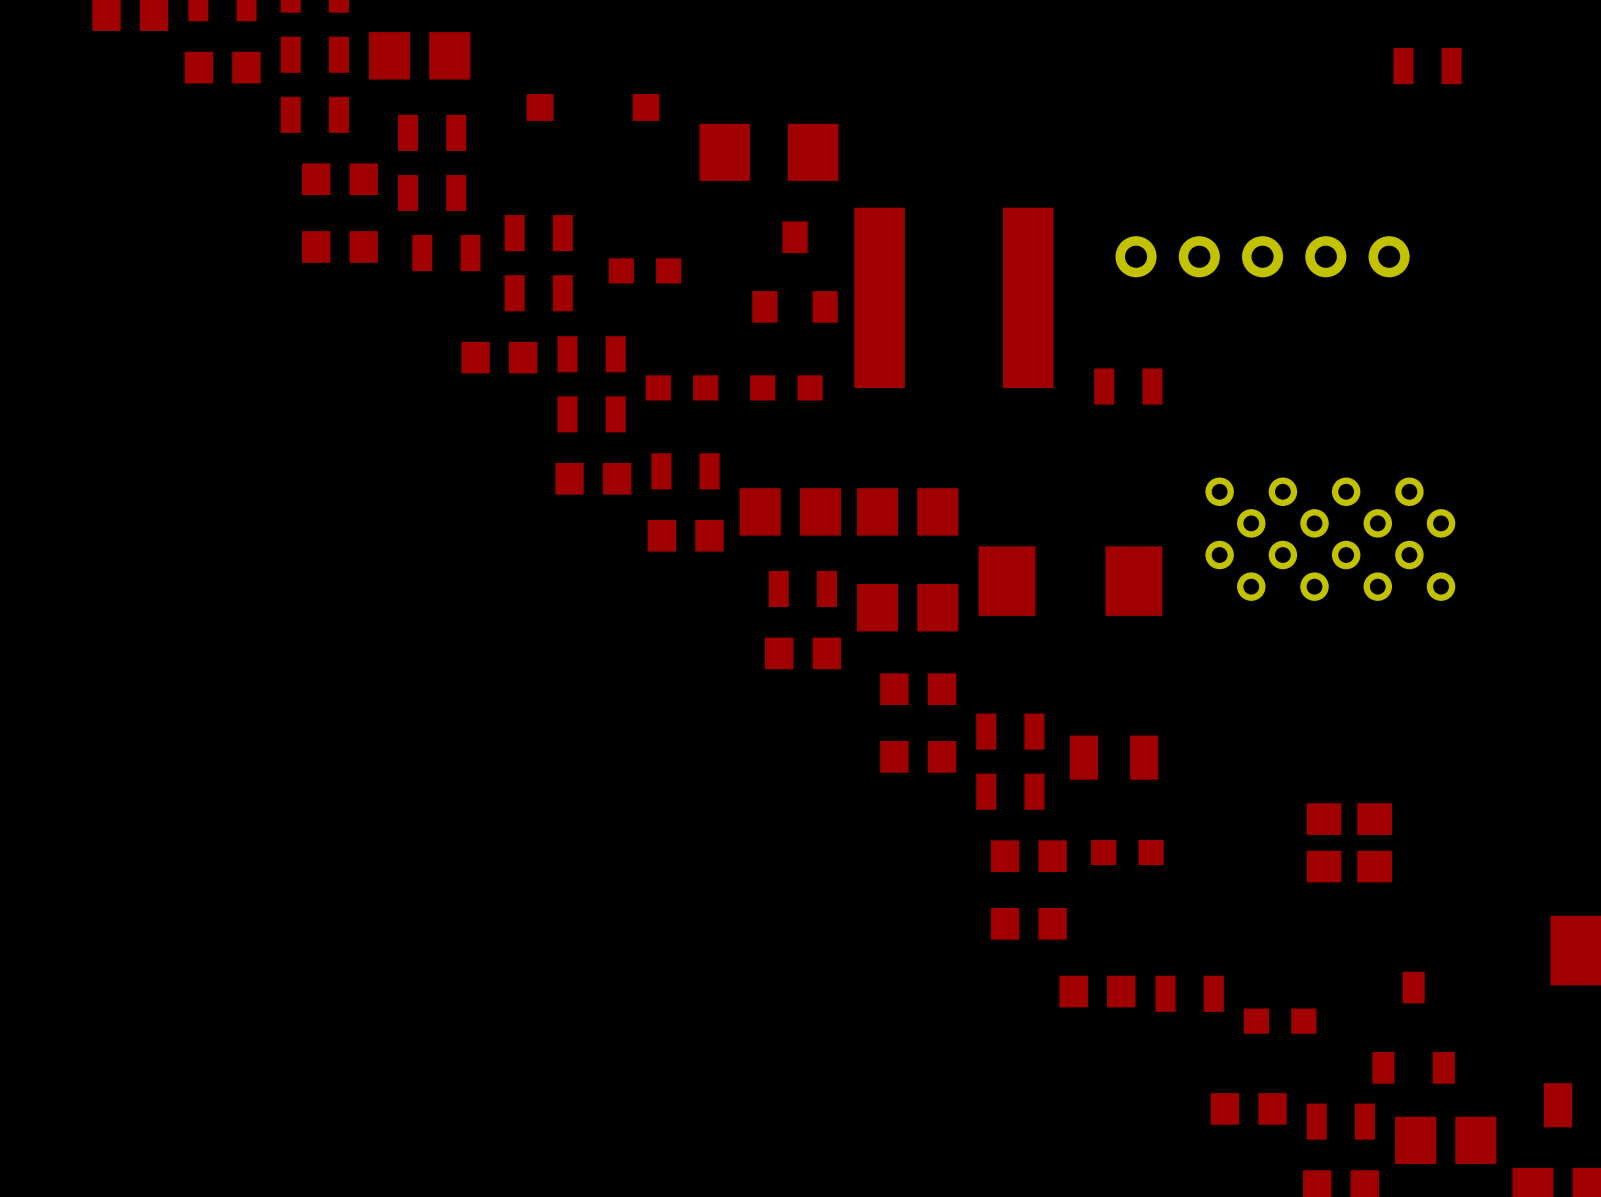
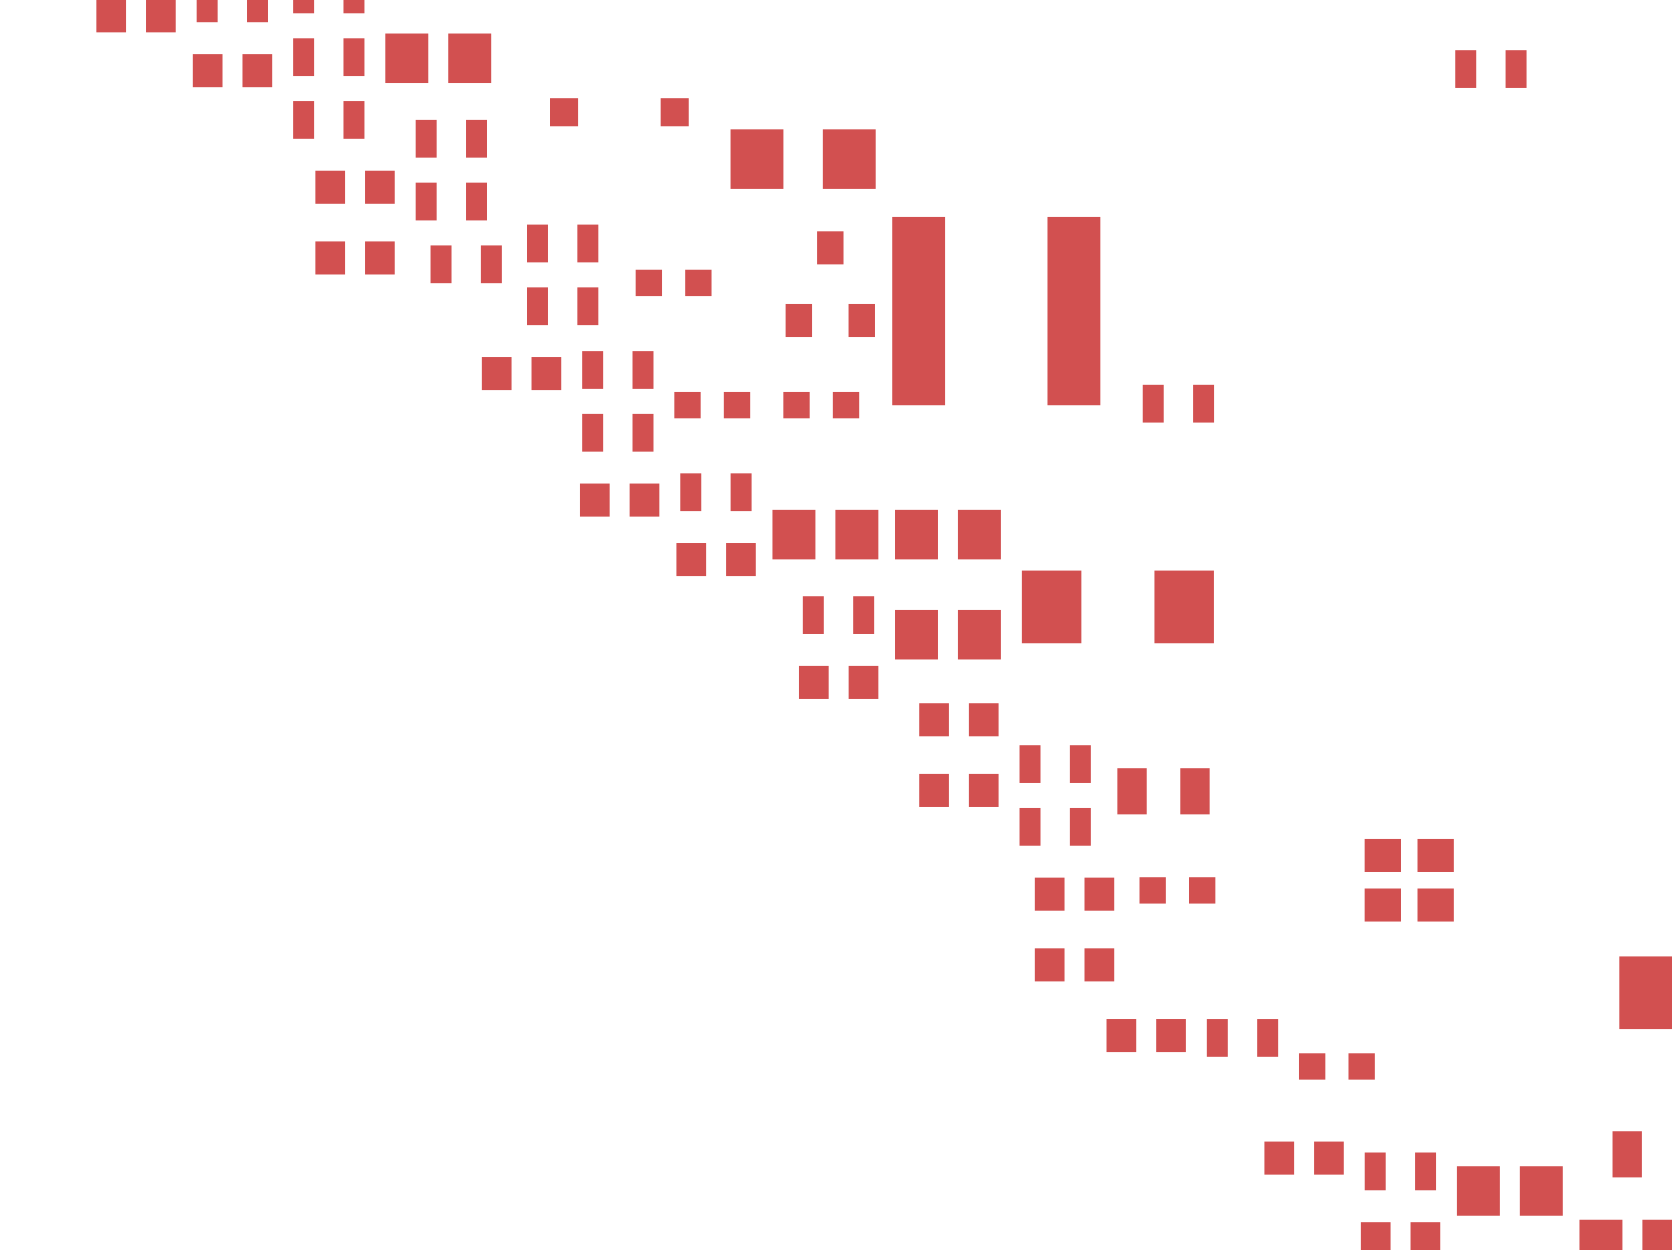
part: (1262, 256) -> none
part: (1330, 539) -> none
part: (1413, 1027) -> none

